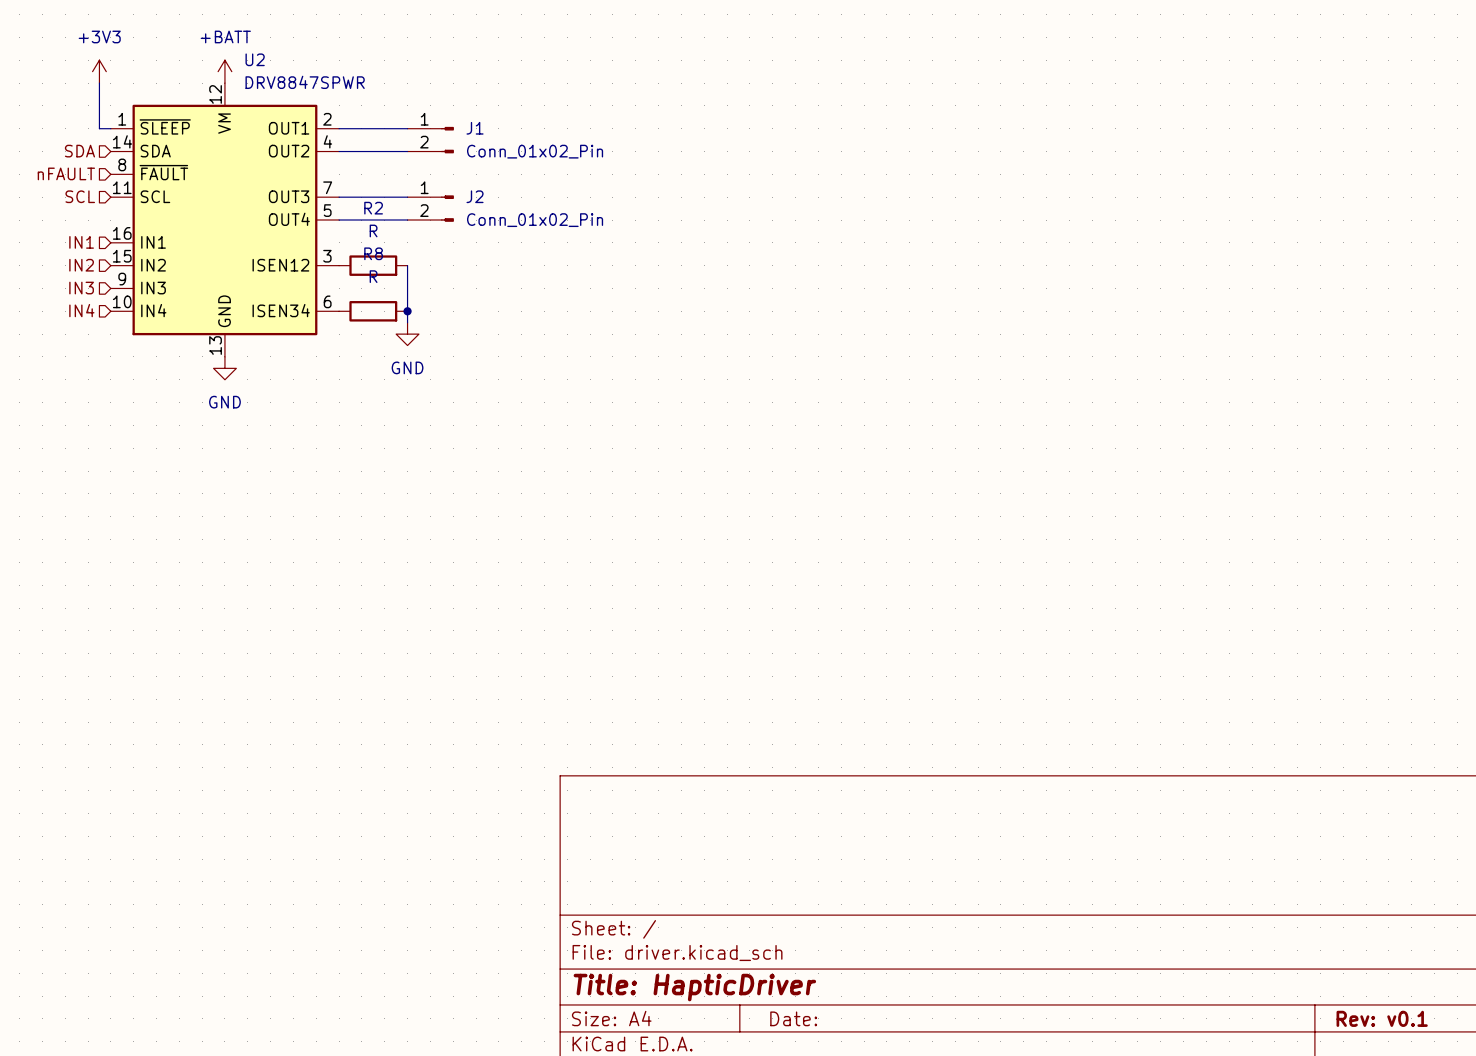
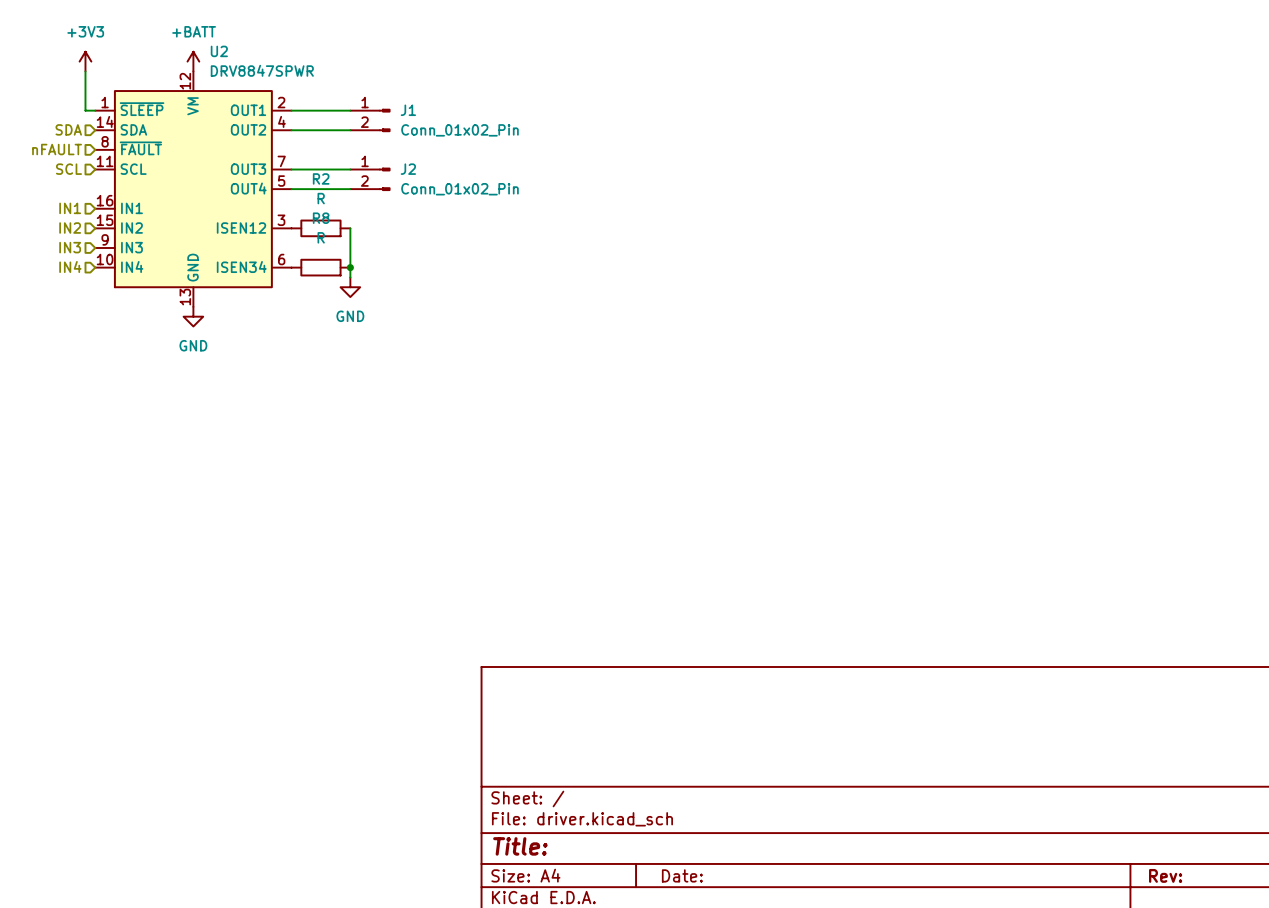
title block: Title: HapticDriver (694, 987) -> Title: (520, 846)
title block: Rev: v0.1 (1382, 1018) -> Rev: (1165, 875)

